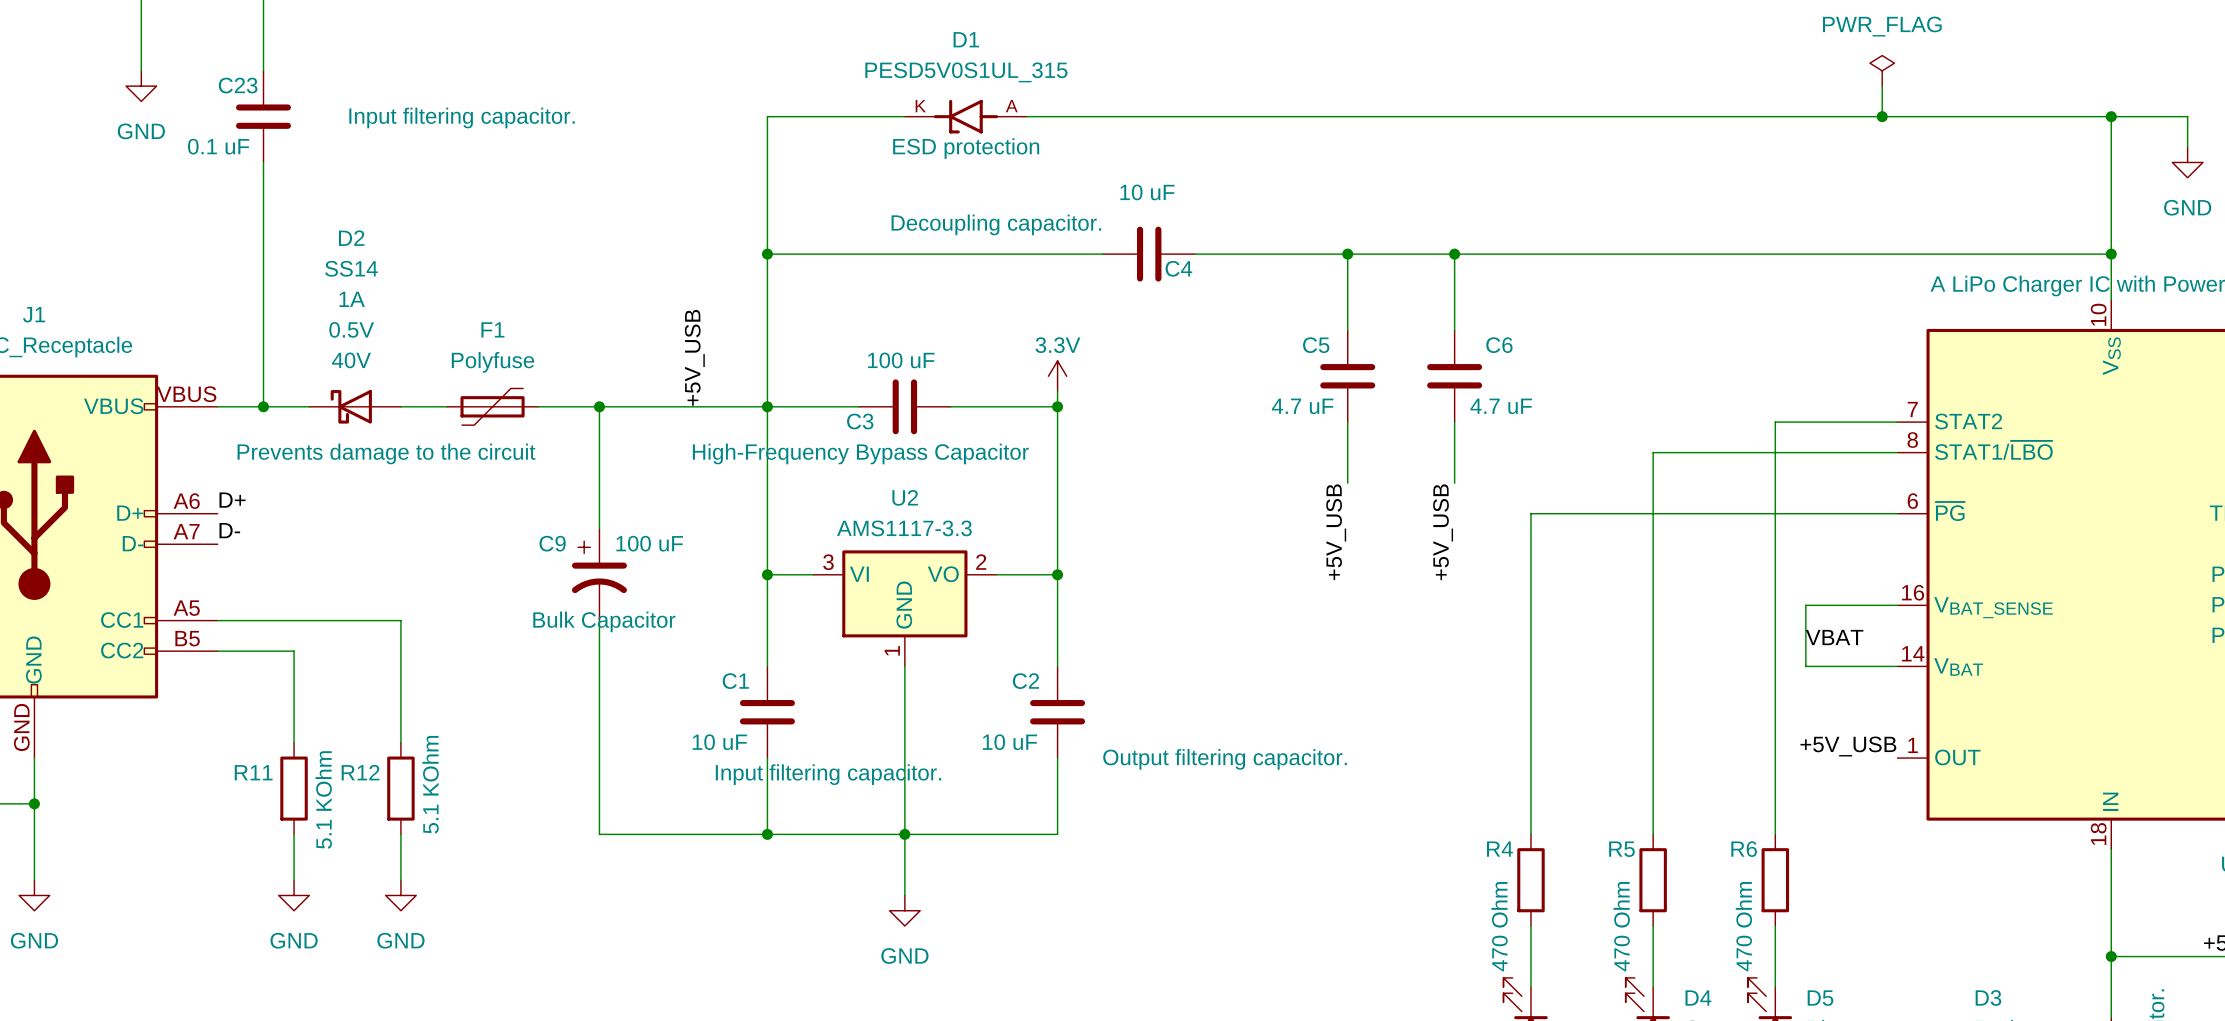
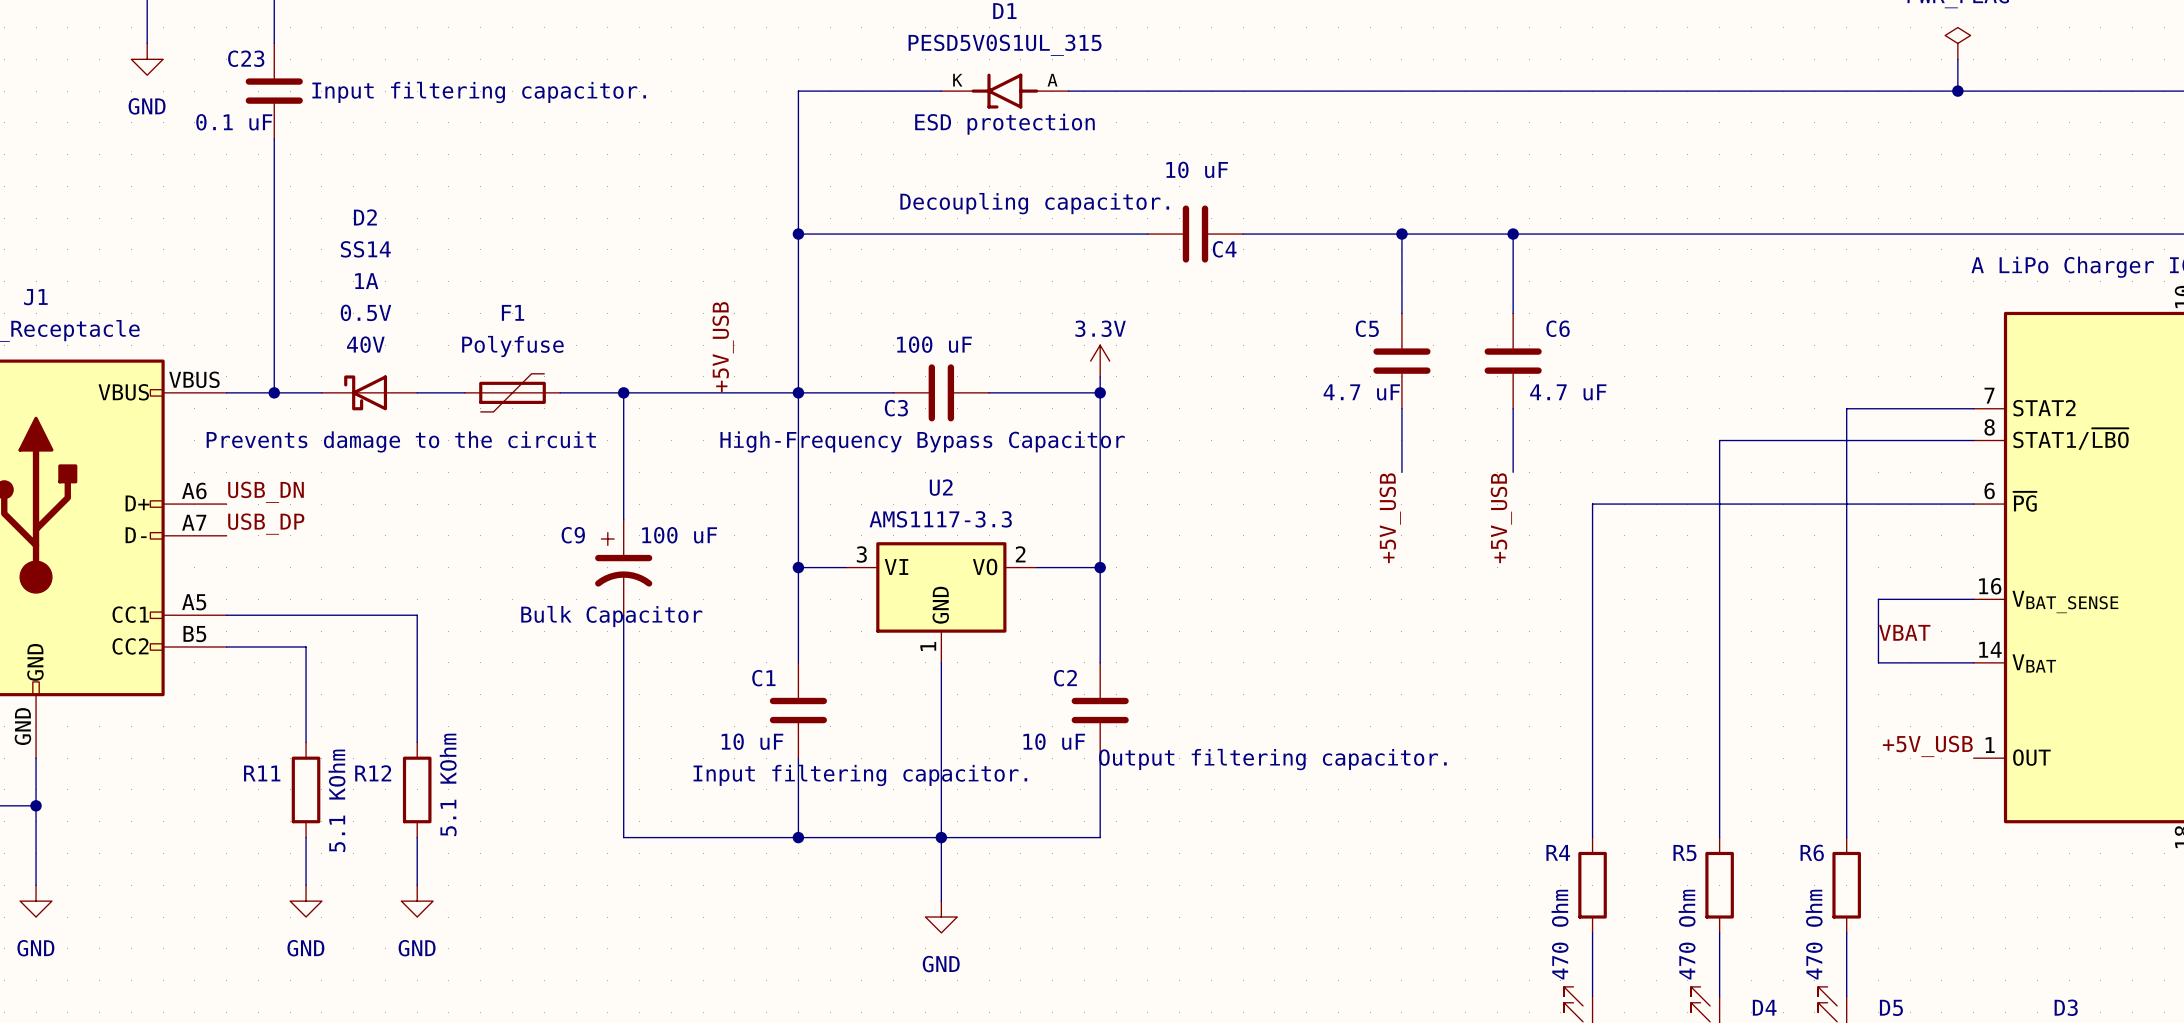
label: D+ (232, 500) -> USB_DN (266, 492)
label: D- (229, 530) -> USB_DP (266, 524)

